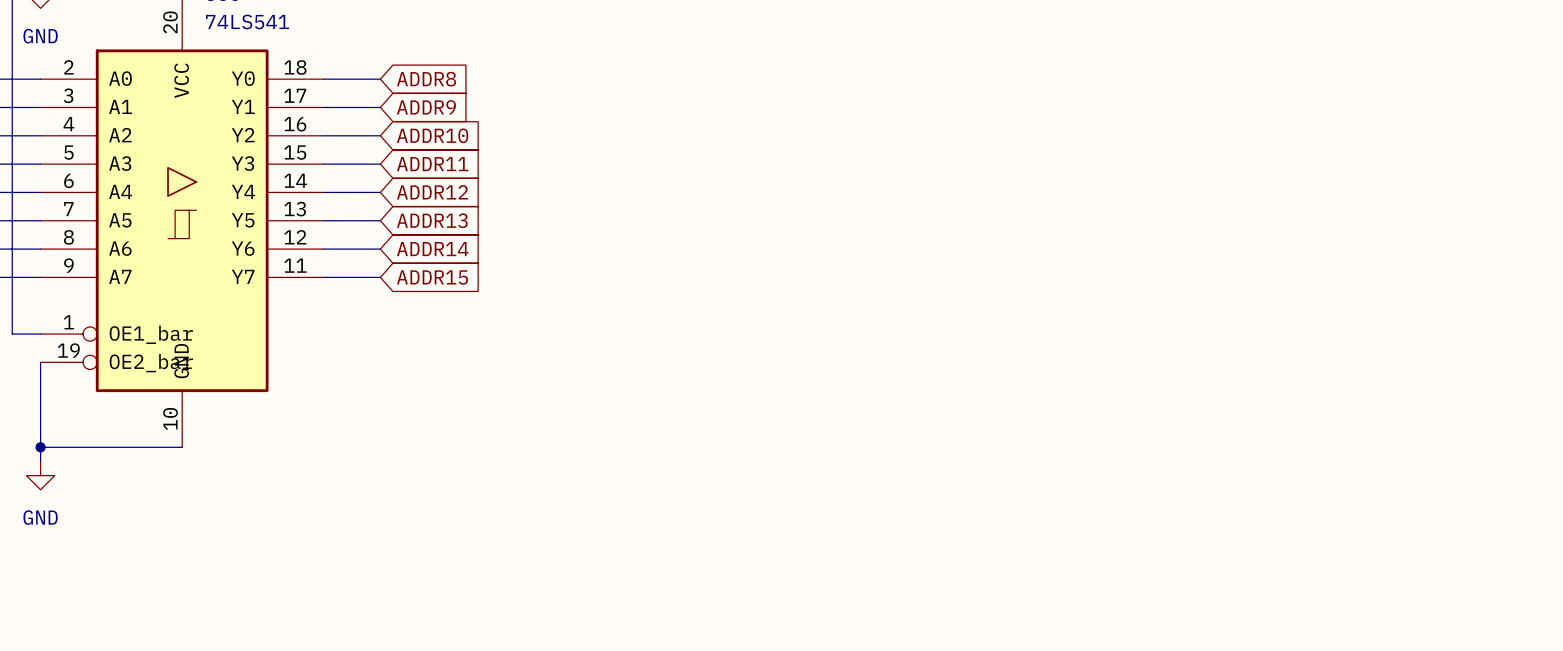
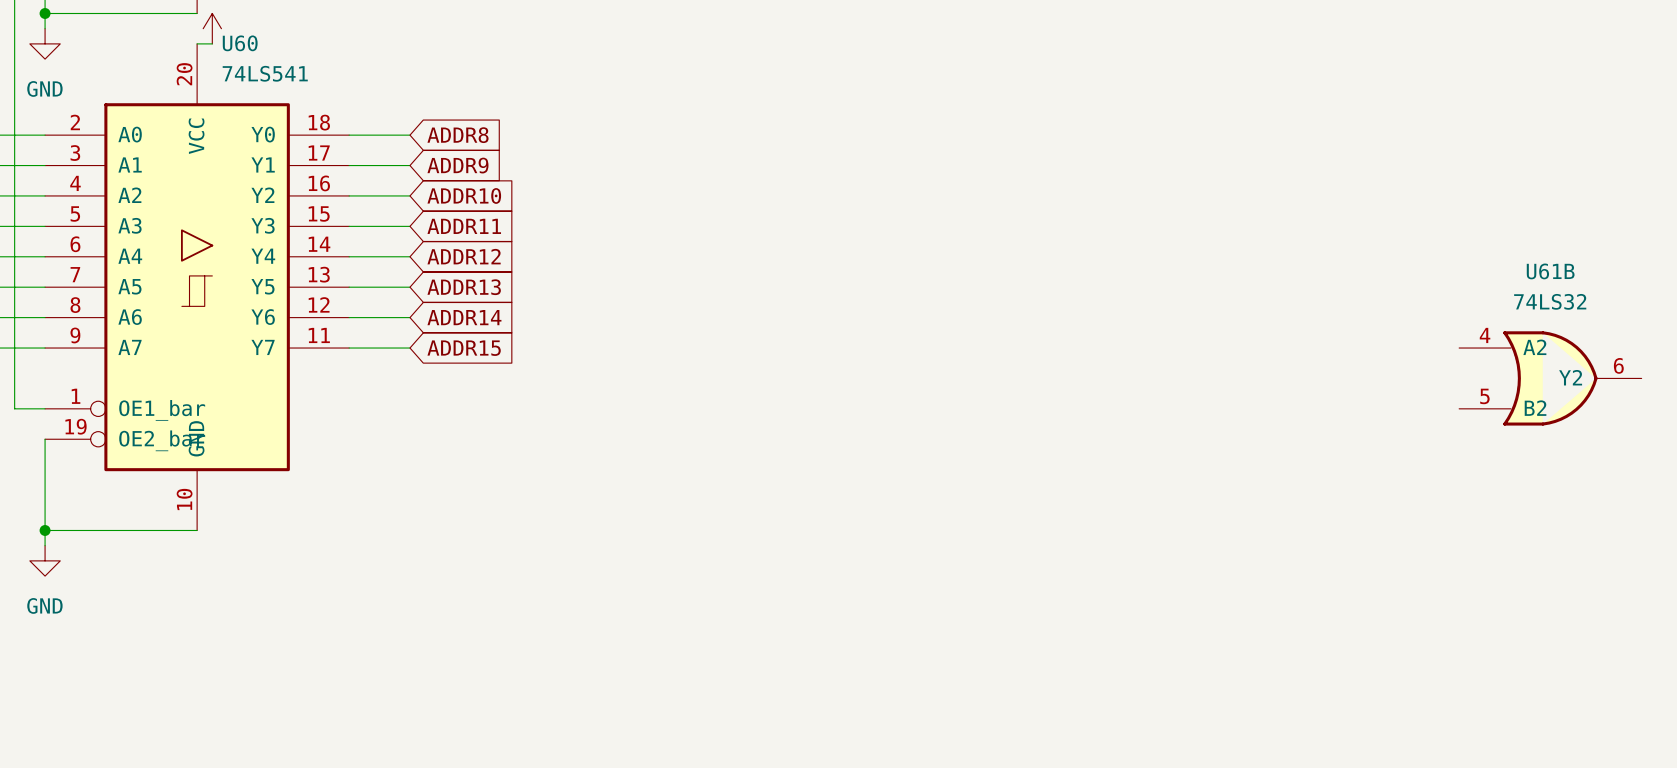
U61B: none -> 74LS32 (1550, 378)

